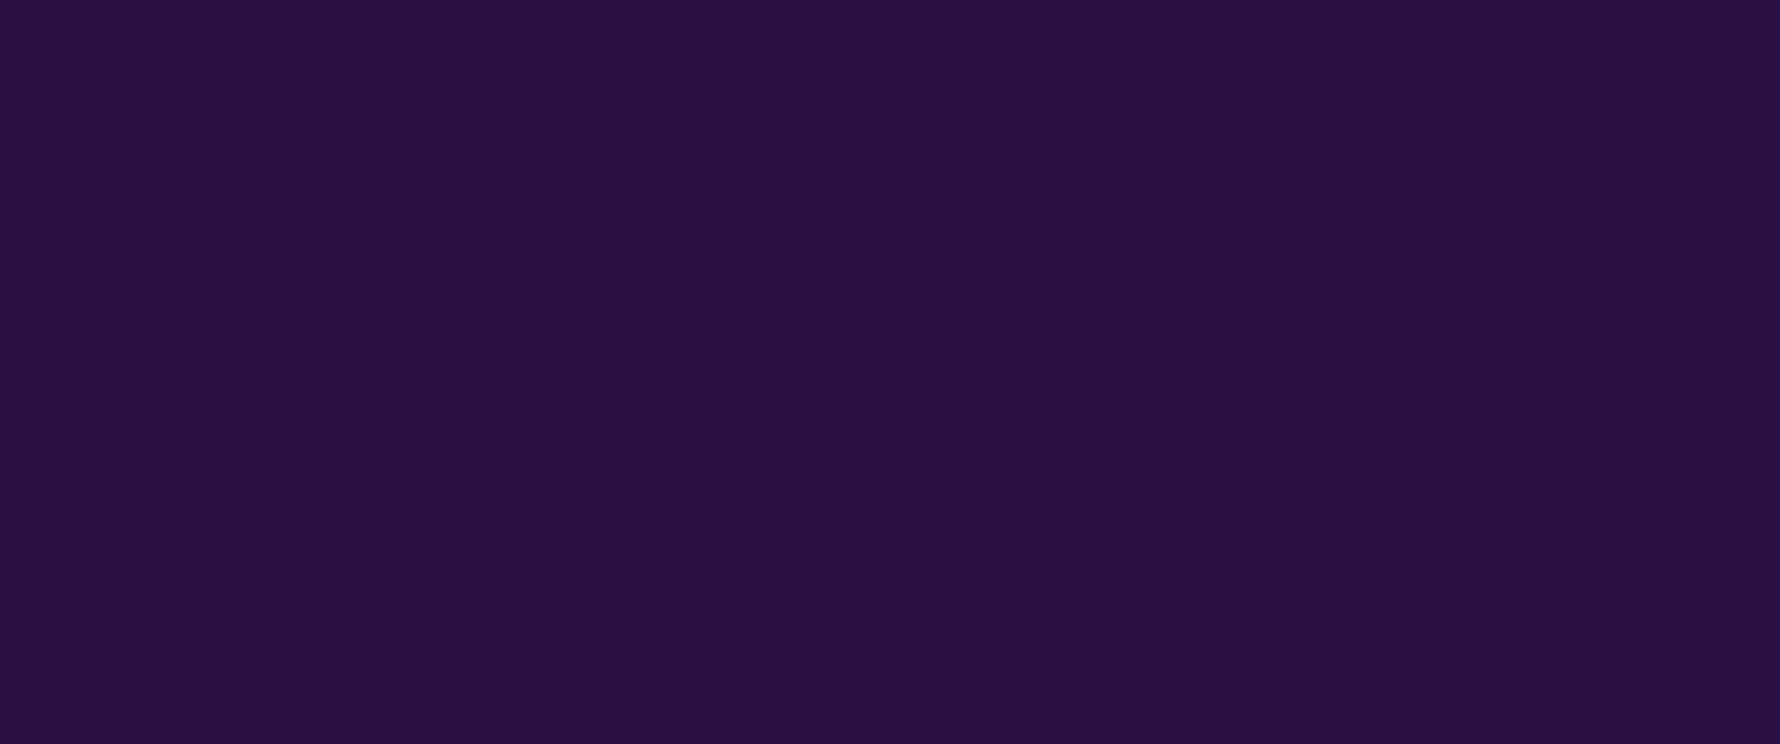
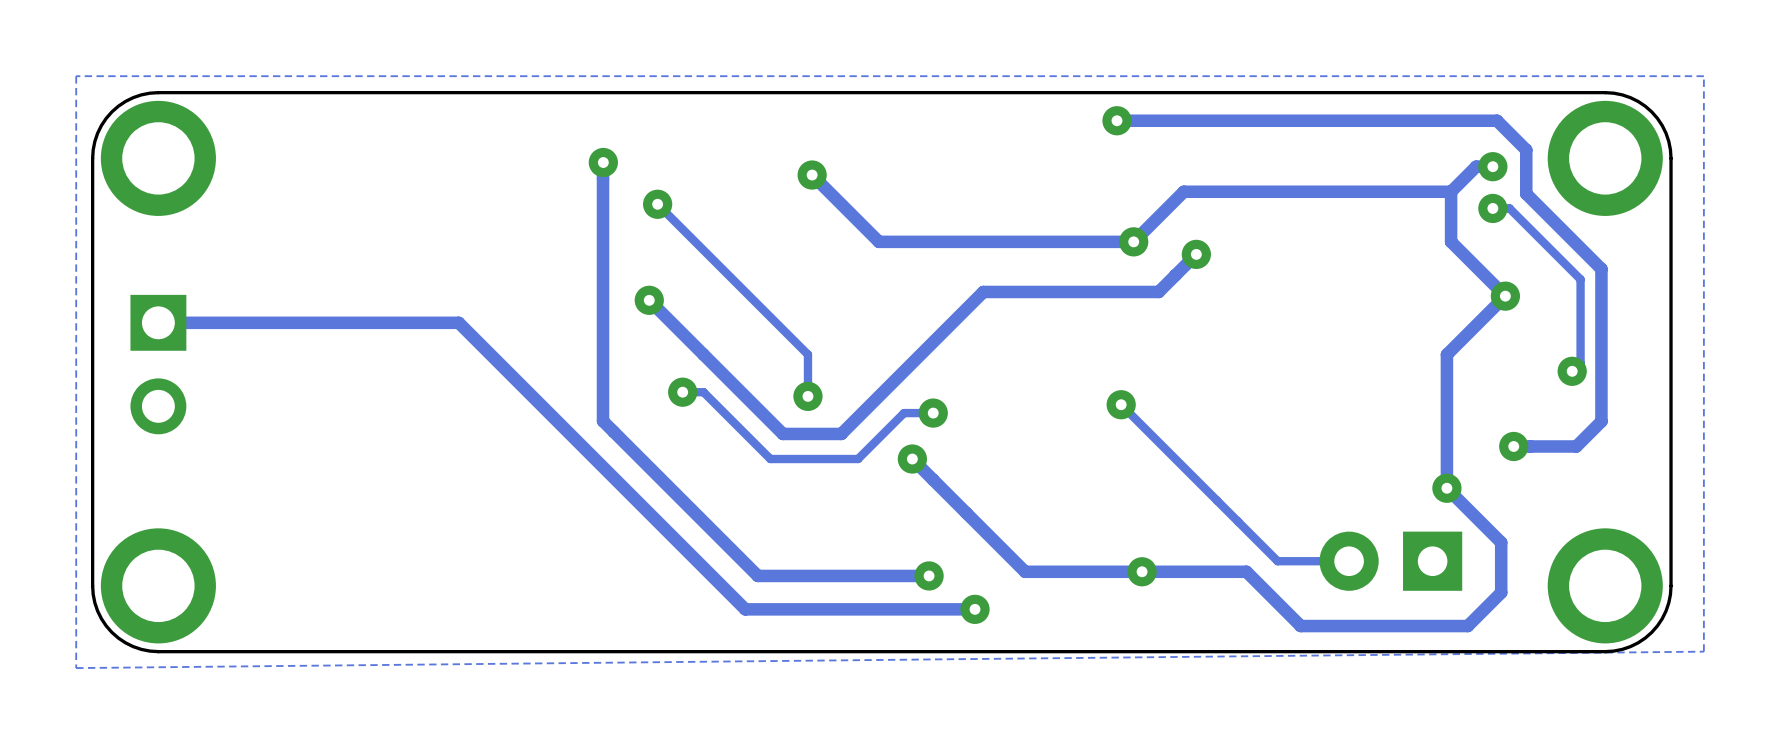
zone outline: none -> (1703, 76) (76, 76) (76, 668) (1703, 651) (1703, 76)
board edge: none -> (1605, 92) (158, 92) (133, 97) (118, 106) (106, 118) (97, 133) (93, 149) (92, 585) (97, 611) (111, 632) (125, 642) (141, 649) (158, 651) (1605, 651) (1630, 646) (1645, 638) (1657, 625) (1666, 611) (1670, 594) (1671, 158) (1666, 133) (1651, 111) (1630, 97) (1605, 92)
track: none -> (1117, 120) (1497, 120) (1526, 149) (1526, 193) (1601, 269) (1601, 421) (1576, 446) (1513, 446)
via: none -> (1117, 120)
part: none -> (158, 158)
part: none -> (1605, 158)
track: none -> (603, 162) (603, 421) (757, 575) (929, 575)
via: none -> (603, 162)
track: none -> (1492, 166) (1476, 166) (1451, 191)
via: none -> (1492, 166)
track: none -> (812, 175) (878, 241) (1133, 241) (1183, 191) (1451, 191)
via: none -> (812, 175)
track: none -> (1451, 191) (1451, 241) (1505, 296) (1446, 354) (1446, 488) (1501, 542) (1501, 592) (1467, 626) (1300, 626) (1246, 571) (1025, 571) (912, 459)
track: none -> (657, 204) (807, 354) (807, 396)
via: none -> (657, 204)
track: none -> (1492, 208) (1509, 208) (1580, 279) (1580, 362) (1572, 371)
via: none -> (1492, 208)
via: none -> (1133, 241)
track: none -> (1196, 254) (1158, 291) (983, 291) (841, 433) (782, 433) (649, 300)
via: none -> (1196, 254)
via: none -> (1505, 296)
via: none -> (649, 300)
track: none -> (158, 322) (458, 322) (745, 609) (975, 609)
part: none -> (158, 364)
via: none -> (1572, 371)
track: none -> (682, 392) (703, 392) (770, 459) (858, 459) (904, 413) (933, 413)
via: none -> (682, 392)
via: none -> (807, 396)
track: none -> (1121, 404) (1277, 561) (1349, 561)
via: none -> (1121, 404)
via: none -> (933, 413)
via: none -> (1513, 446)
via: none -> (912, 459)
via: none -> (1446, 488)
part: none -> (1390, 561)
via: none -> (1142, 571)
via: none -> (929, 575)
part: none -> (158, 585)
part: none -> (1605, 585)
via: none -> (975, 609)

